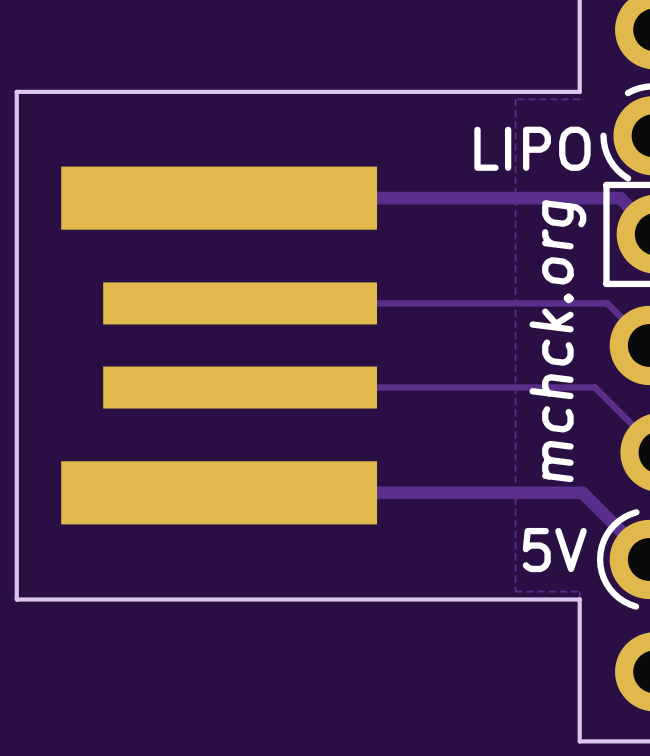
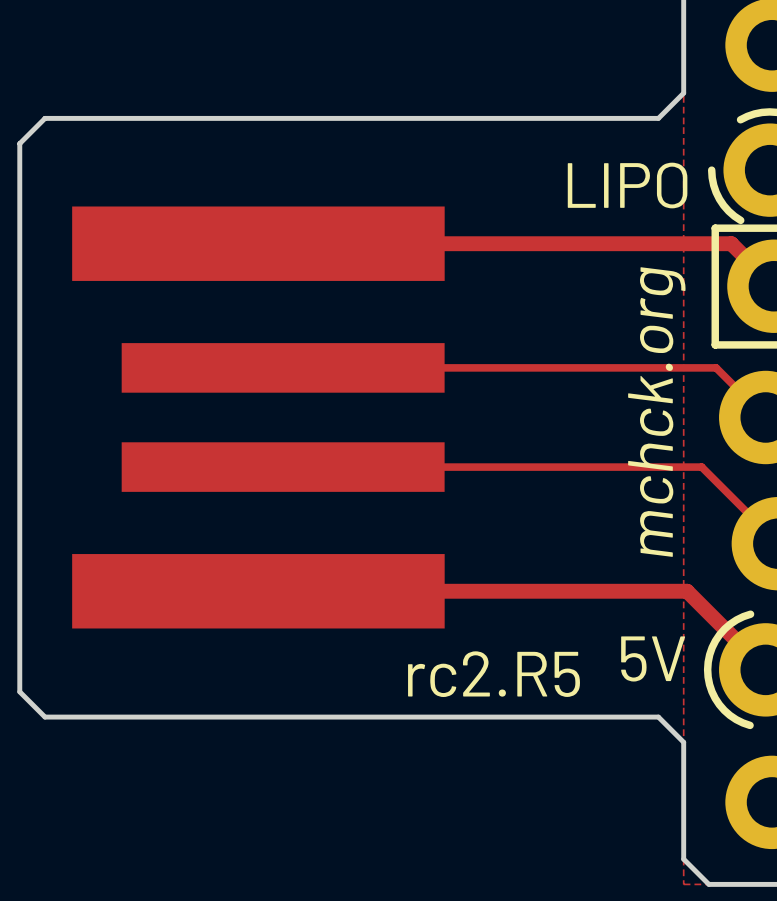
board edge: (579, 70) (579, 91) (558, 91) -> (683, 93) (658, 118)
board edge: (38, 91) (16, 91) (16, 113) -> (45, 118) (19, 143)
zone outline: (579, 99) (515, 99) (515, 591) (579, 591) -> (683, 127) (683, 707)
text: none -> rc2.R5 (494, 674)
board edge: (16, 578) (16, 599) (38, 599) -> (19, 691) (45, 717)
board edge: (558, 599) (579, 599) (579, 620) -> (658, 717) (683, 742)
board edge: (579, 719) (579, 741) (601, 741) -> (683, 859) (708, 884)

